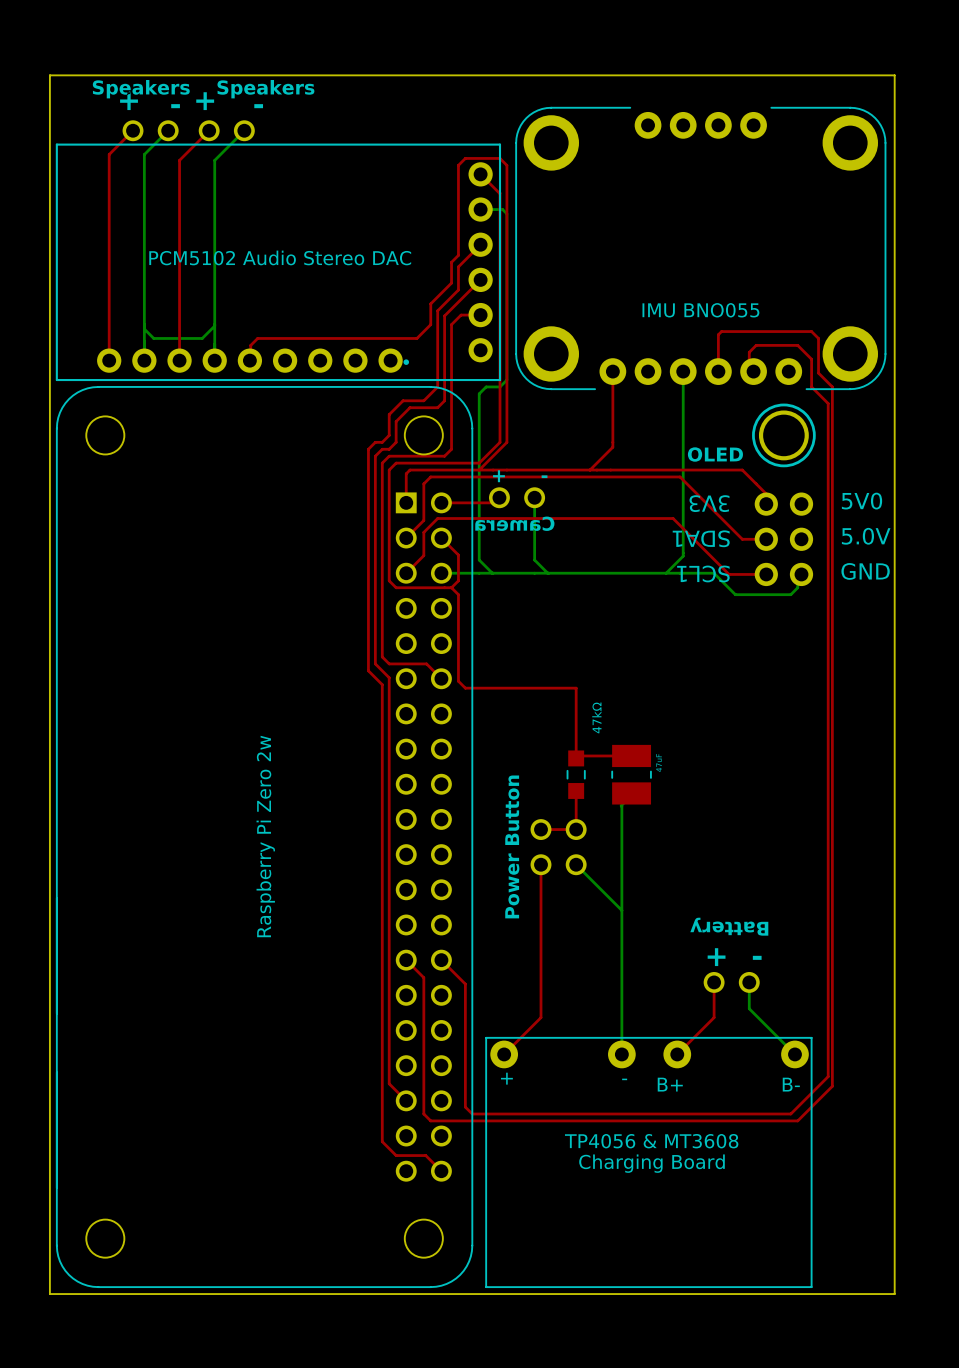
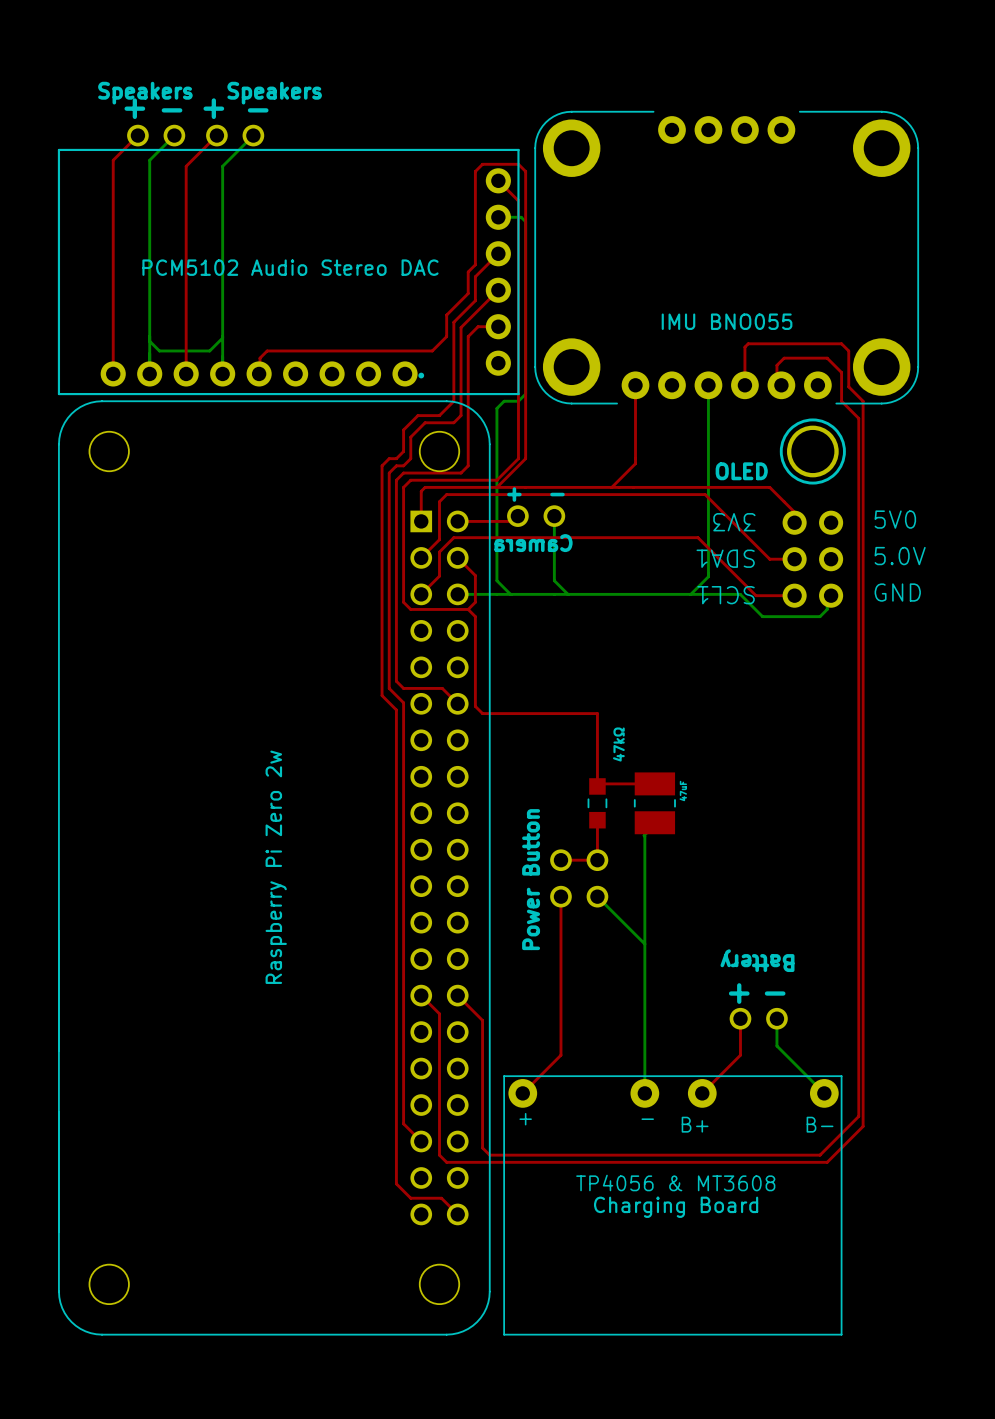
board edge: (49, 75) (894, 75) (894, 1294) (49, 1294) (49, 75) -> none

